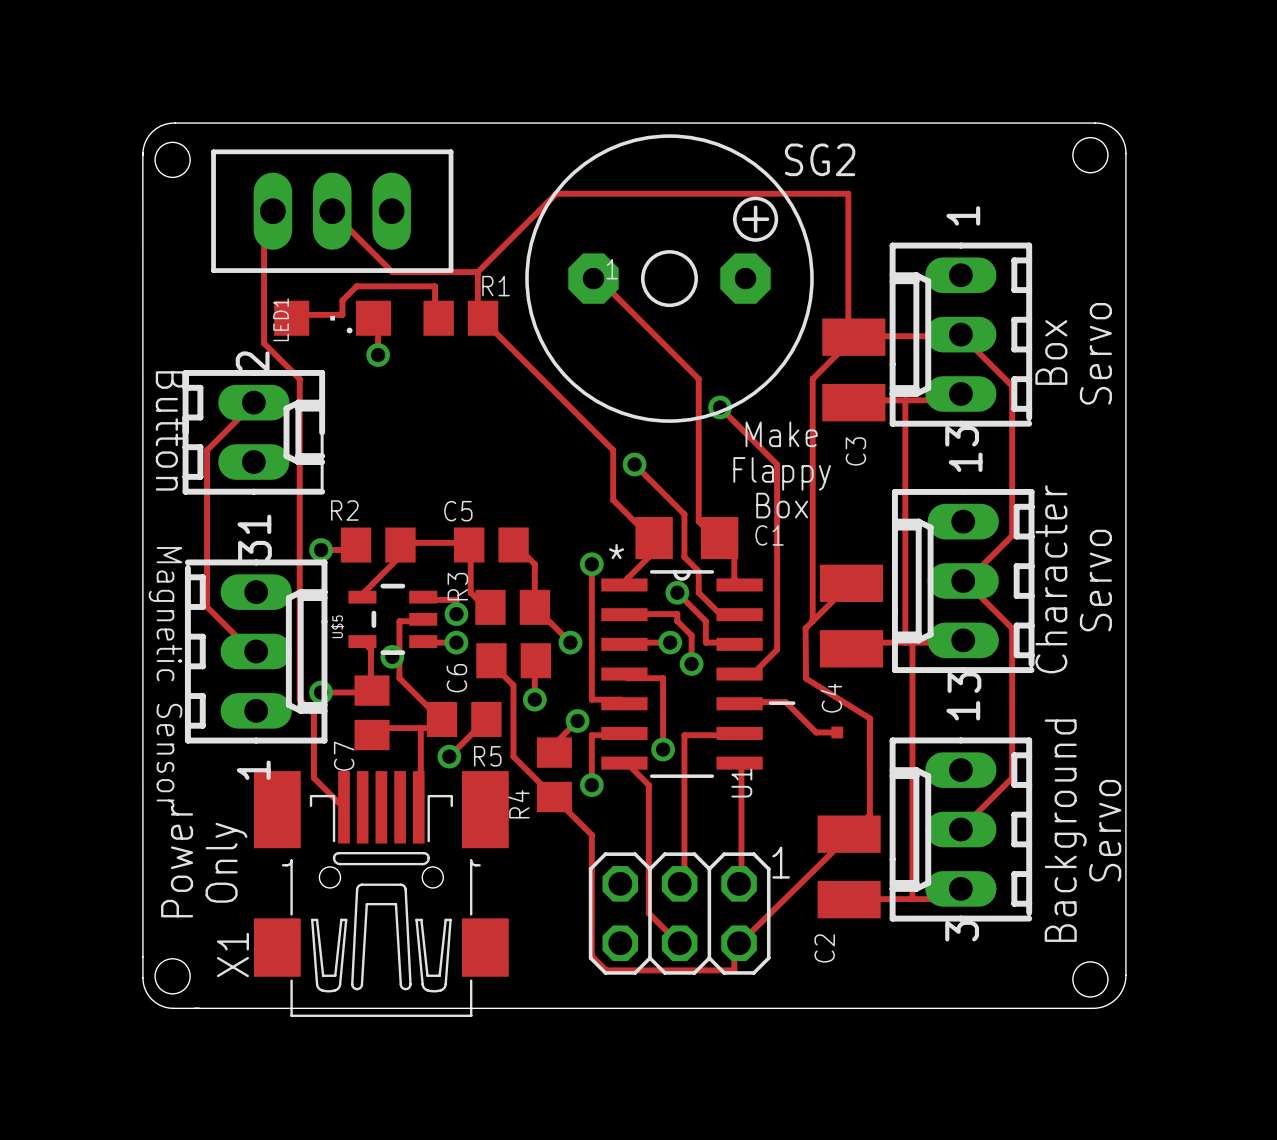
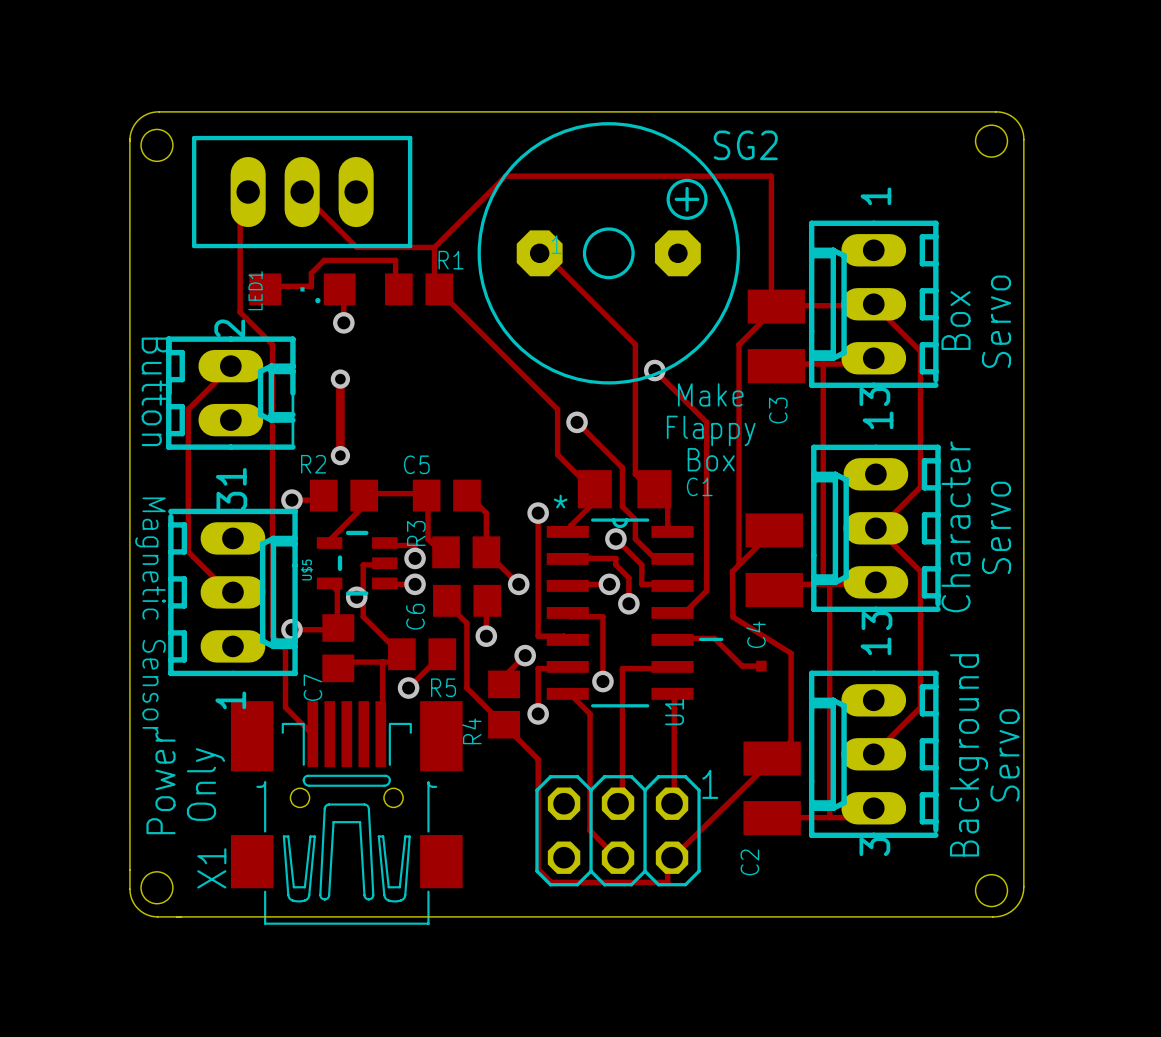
track: none -> (340, 379) (340, 455)
via: none -> (340, 379)
via: none -> (340, 455)

